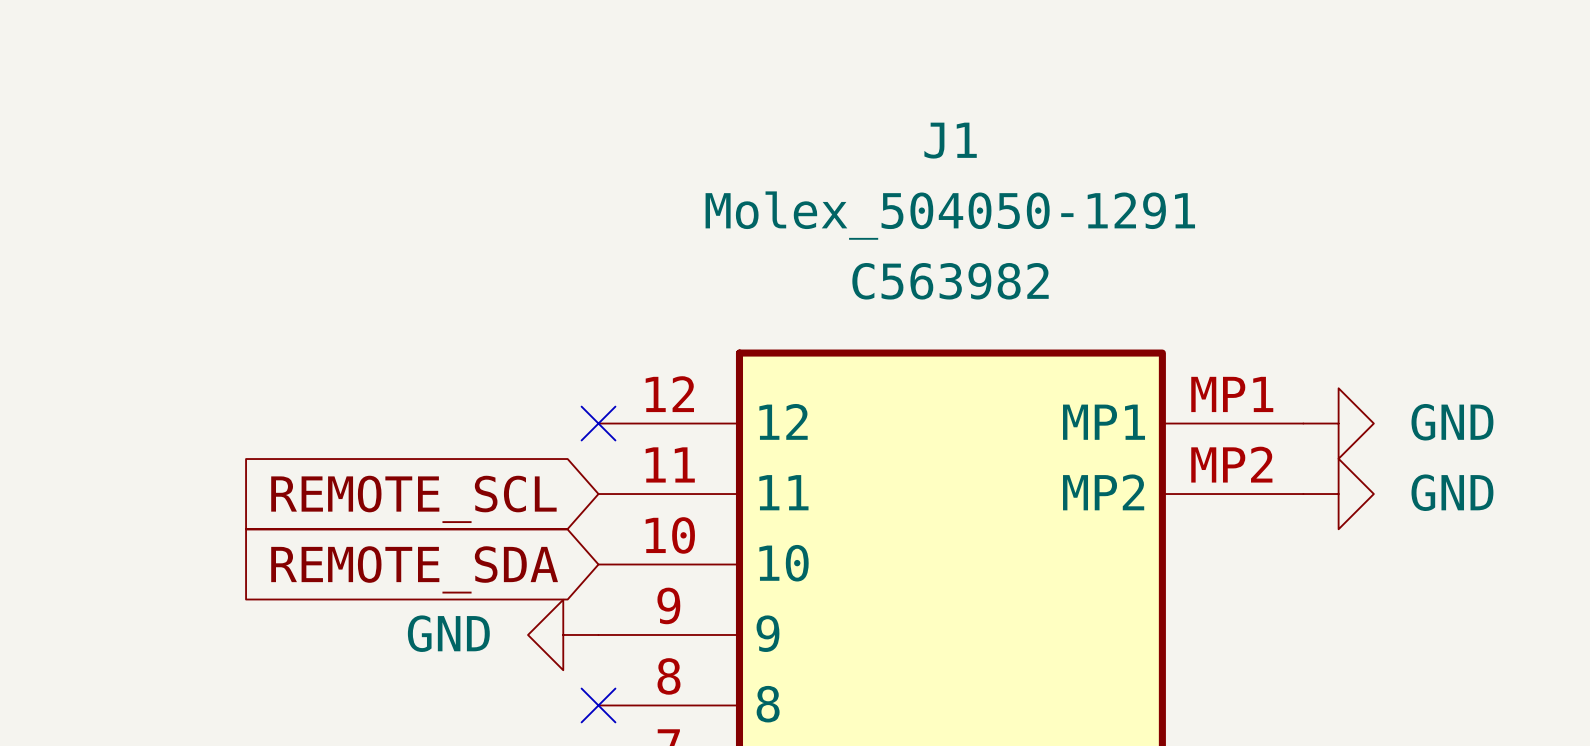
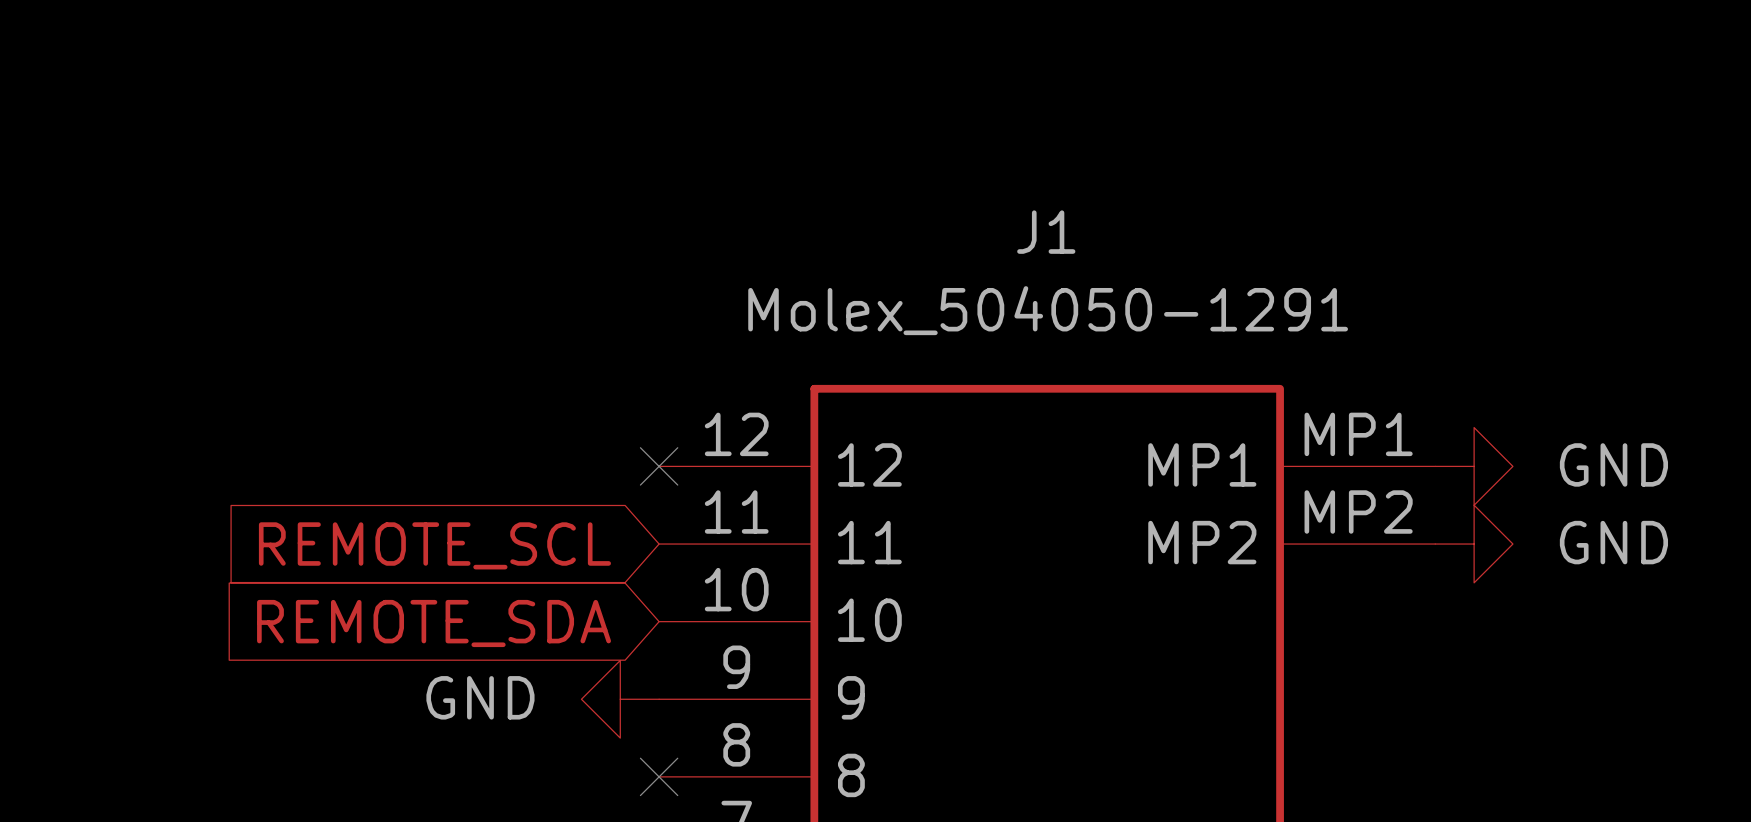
J1 name position: J1 (950, 140) -> J1 (1046, 232)
J1 value position: Molex_504050-1291 (950, 215) -> Molex_504050-1291 (1048, 310)
J1 text: C563982 (950, 281) -> none

